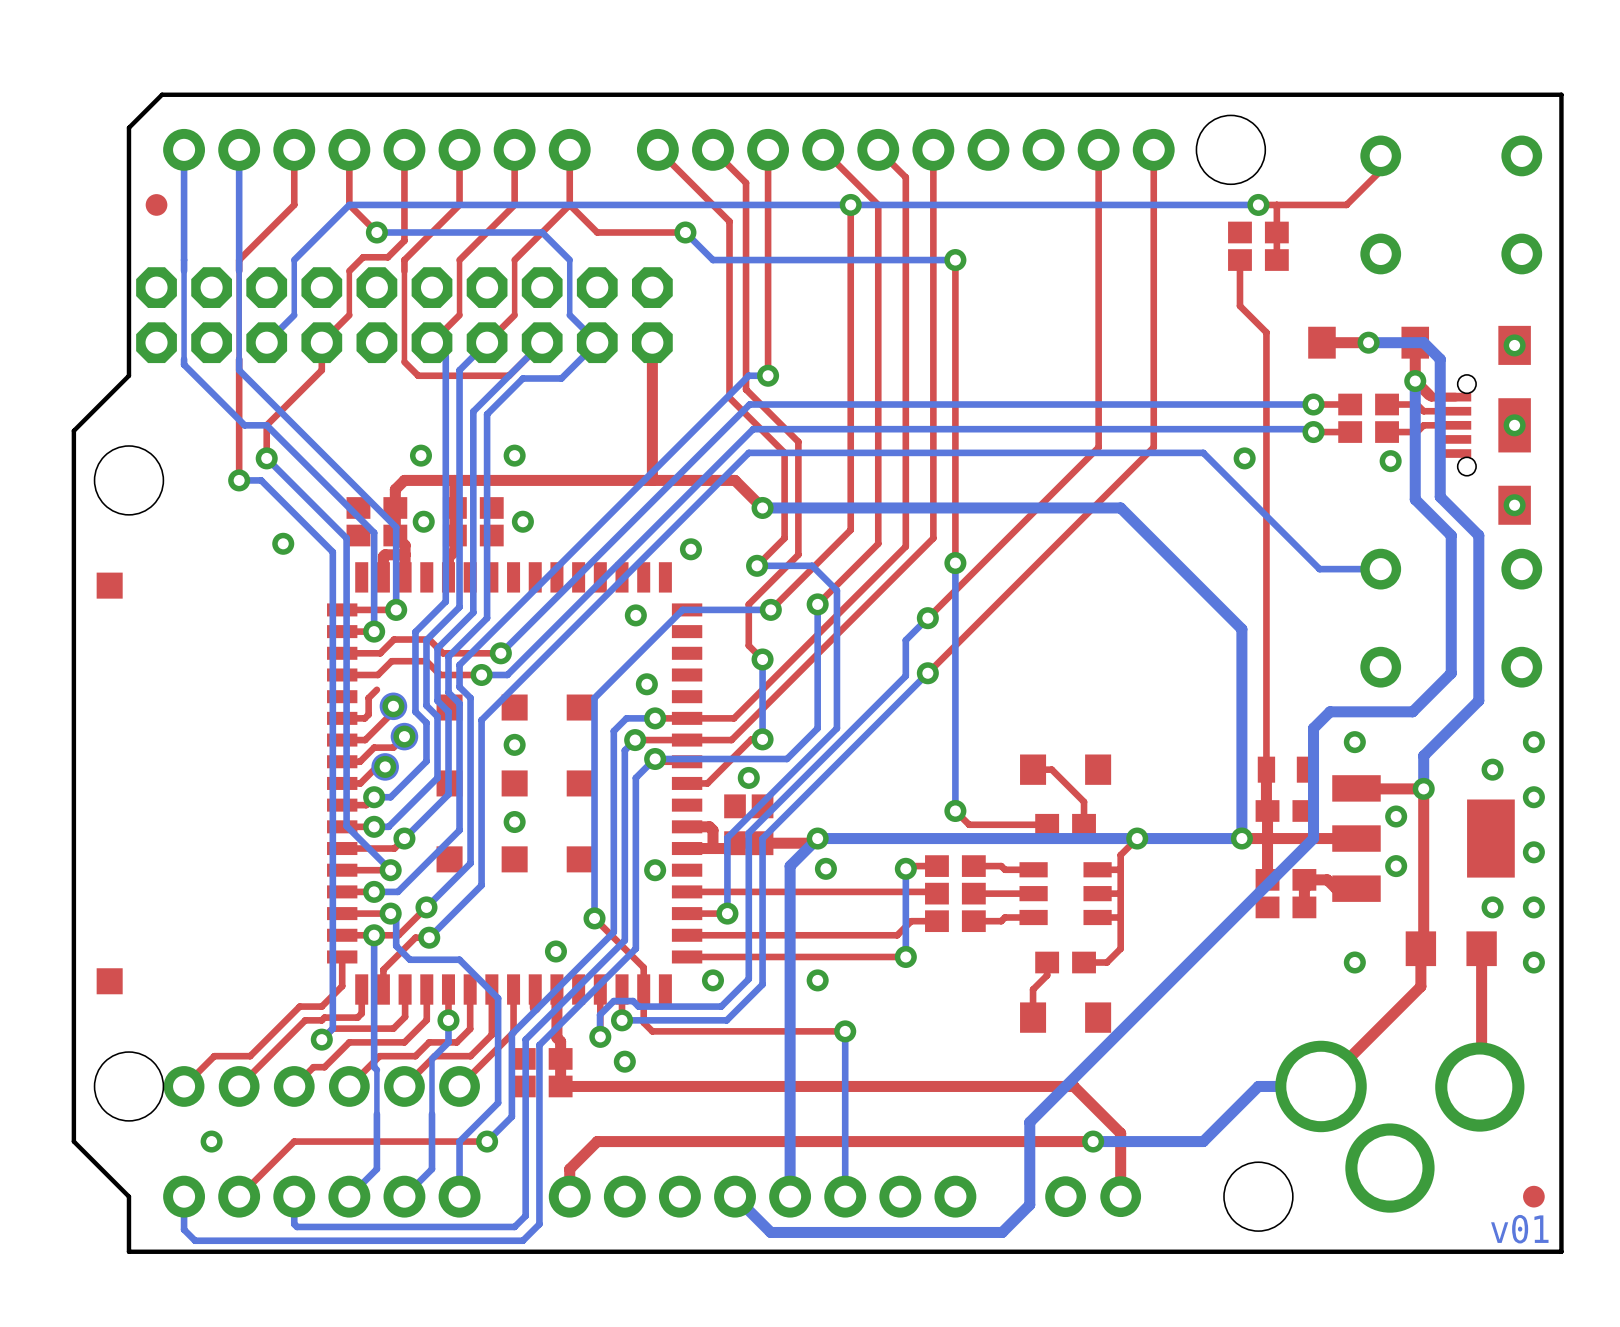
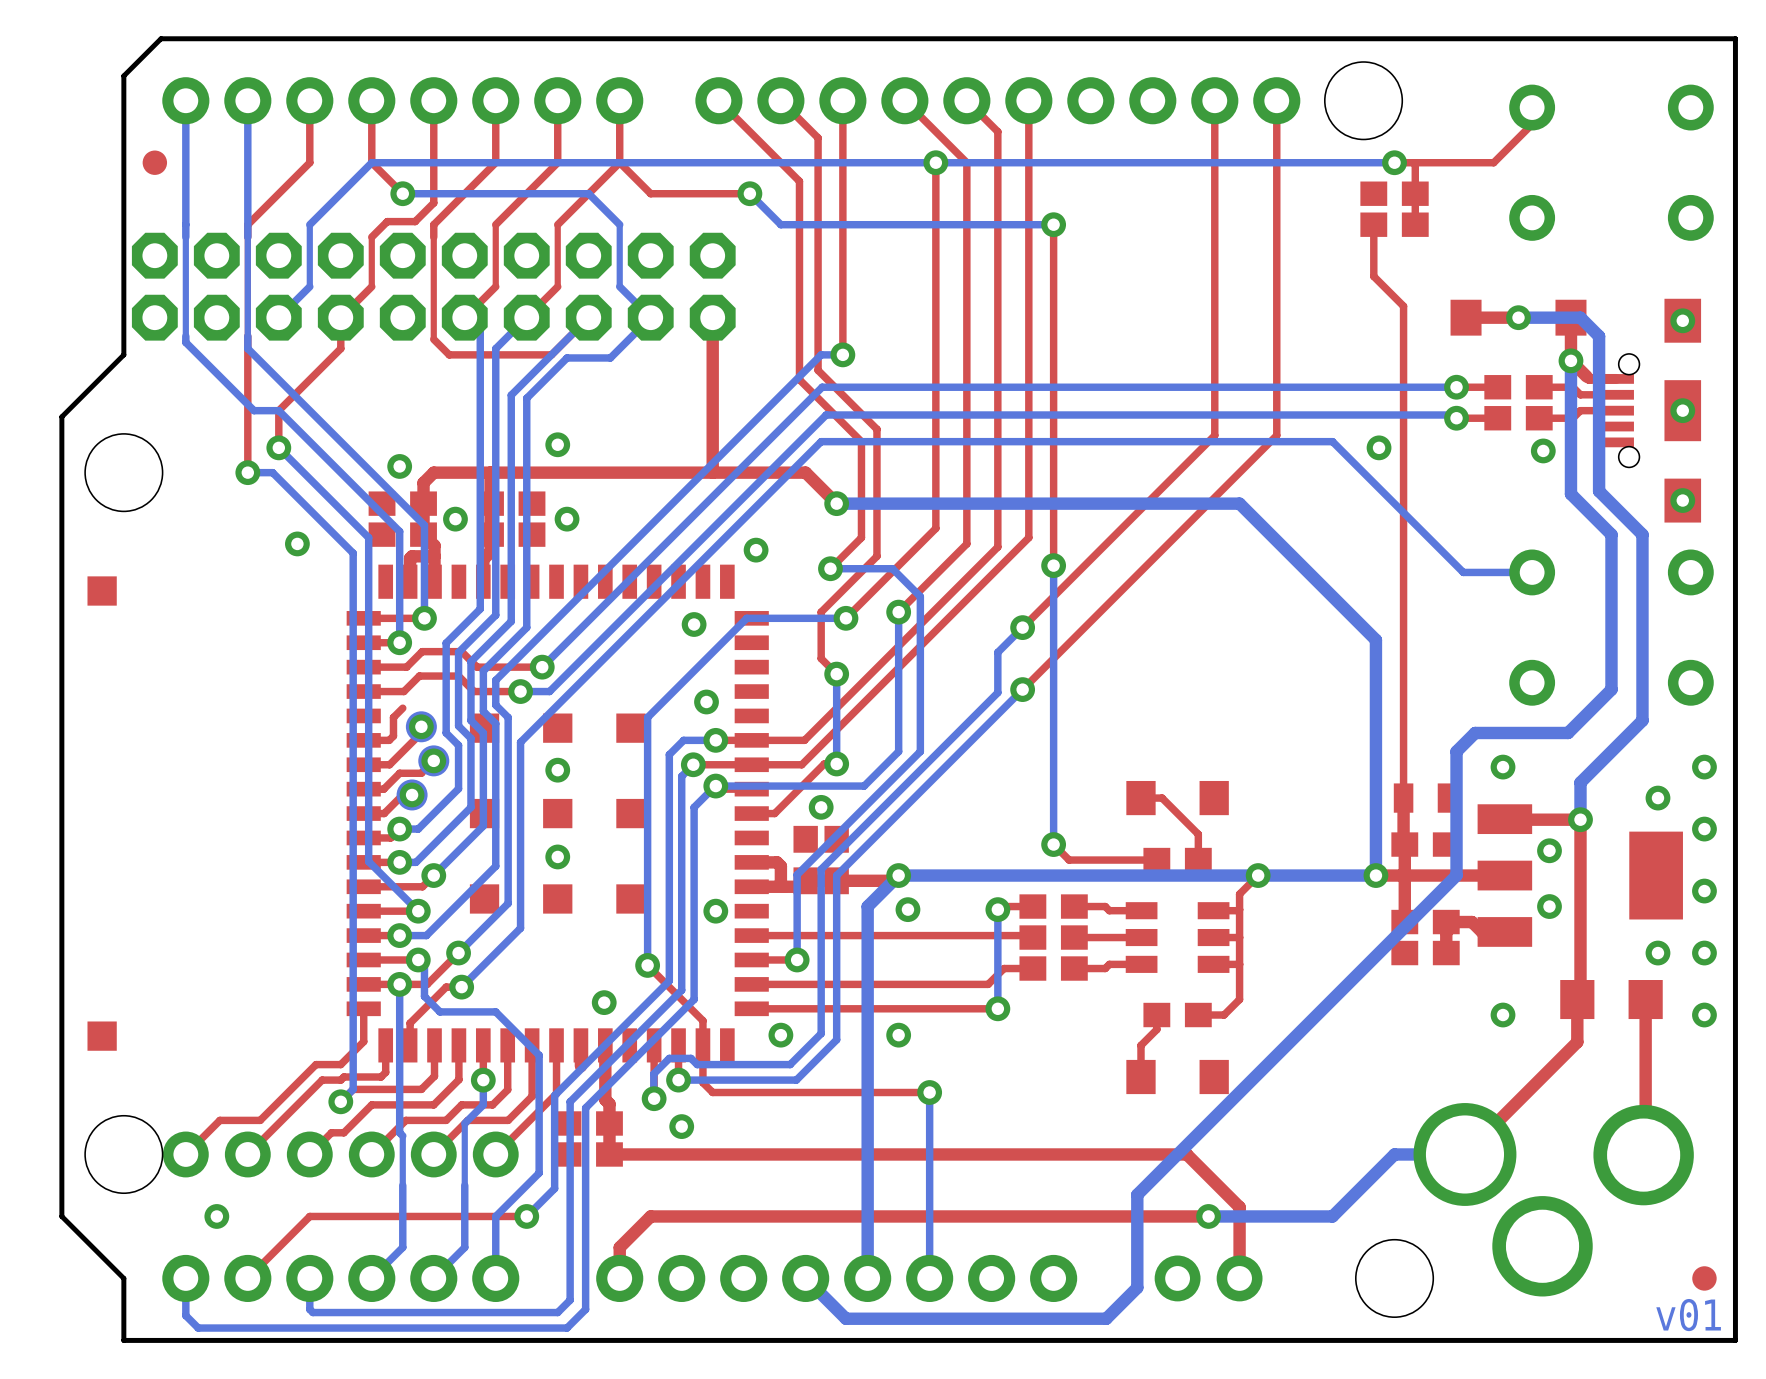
via position: (420, 455) -> (399, 466)

